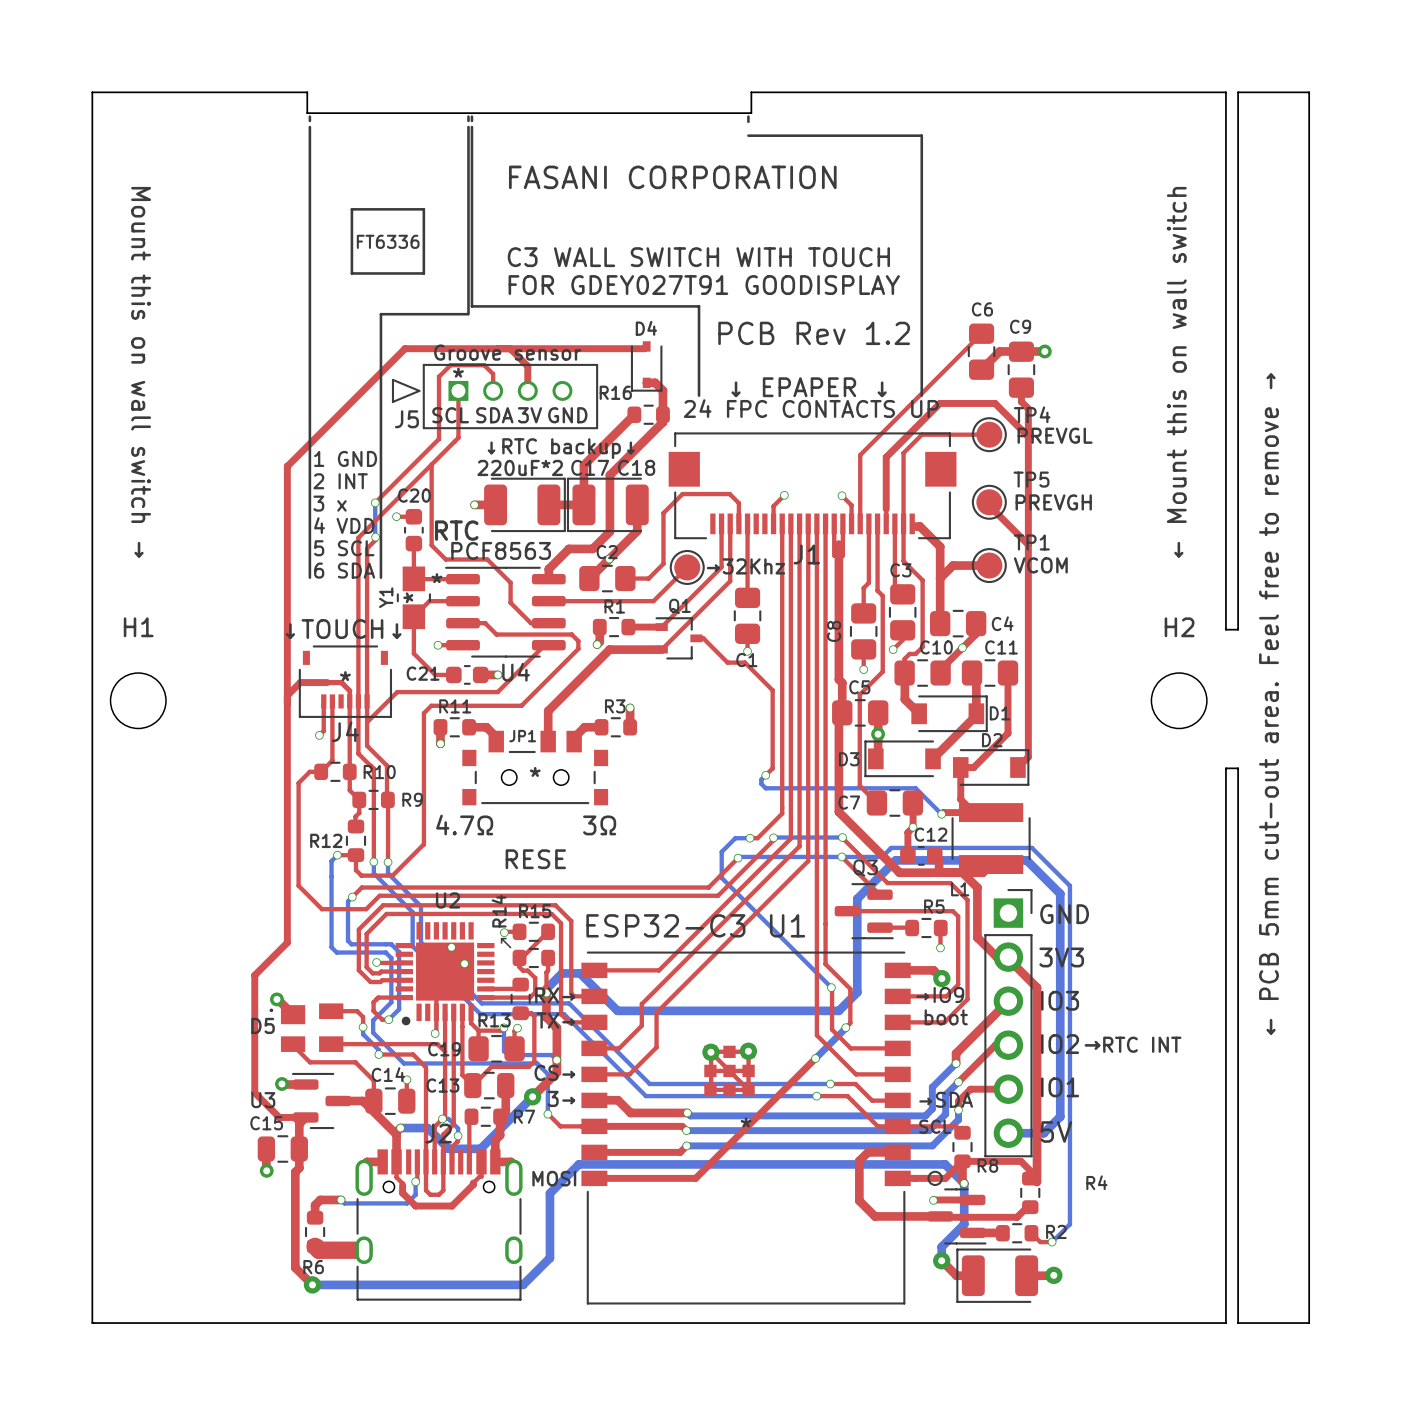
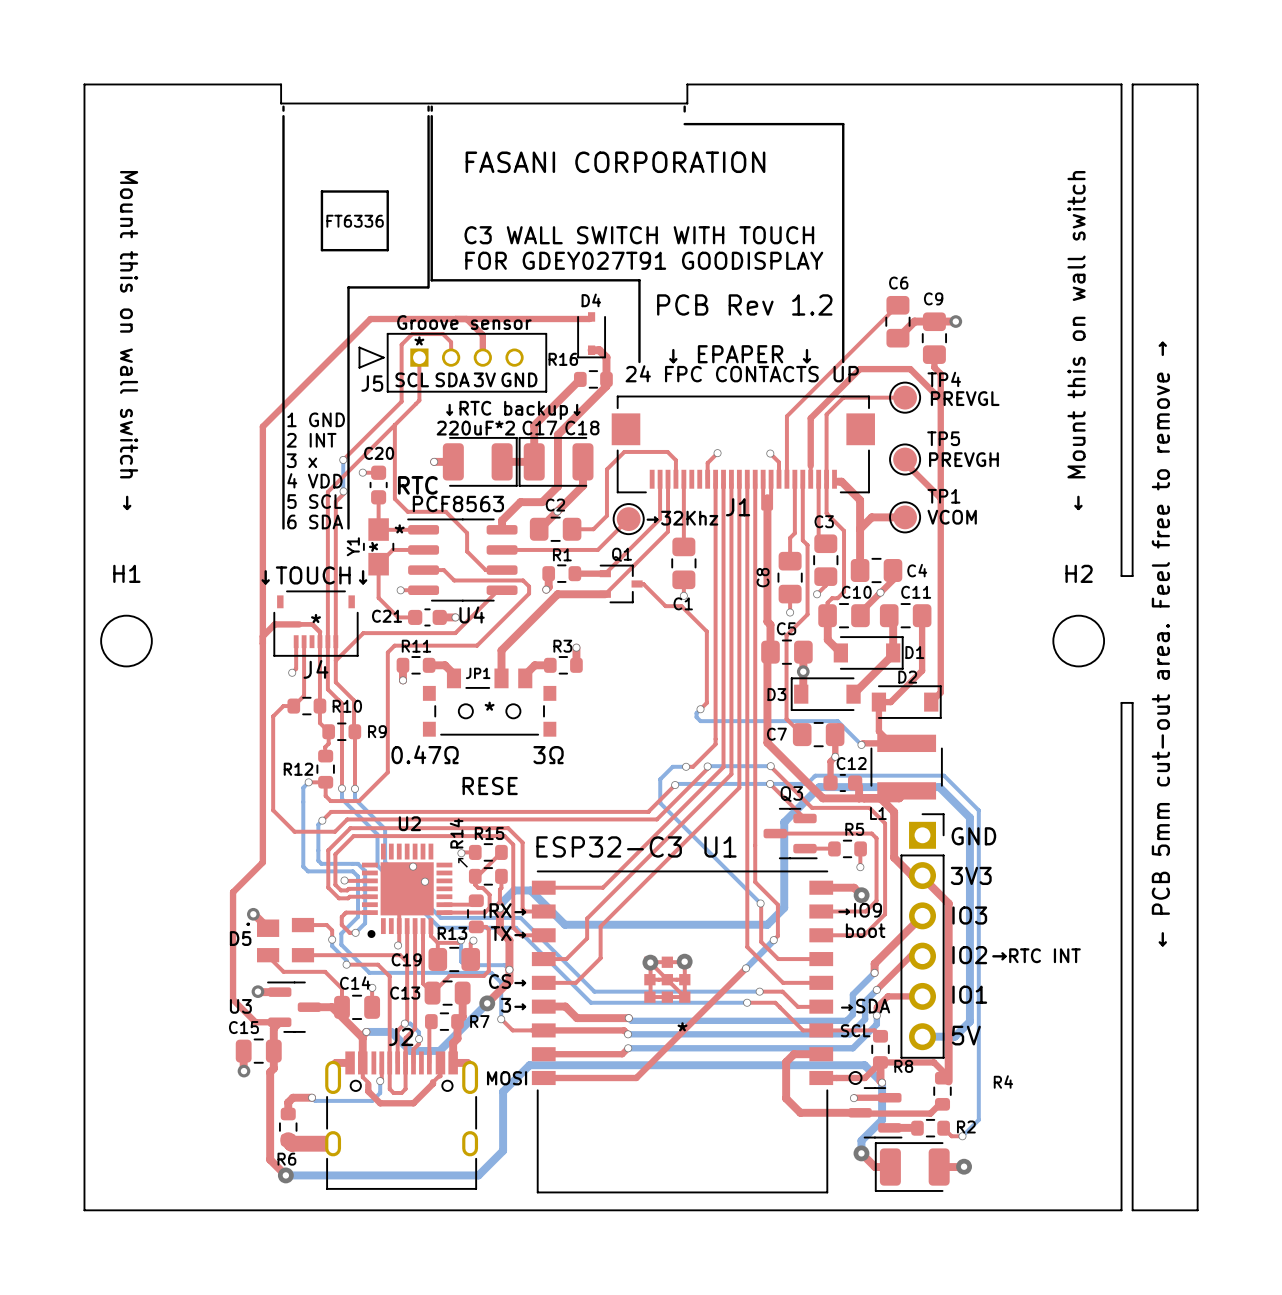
text: 4.7Ω (464, 825) -> 0.47Ω (425, 754)

